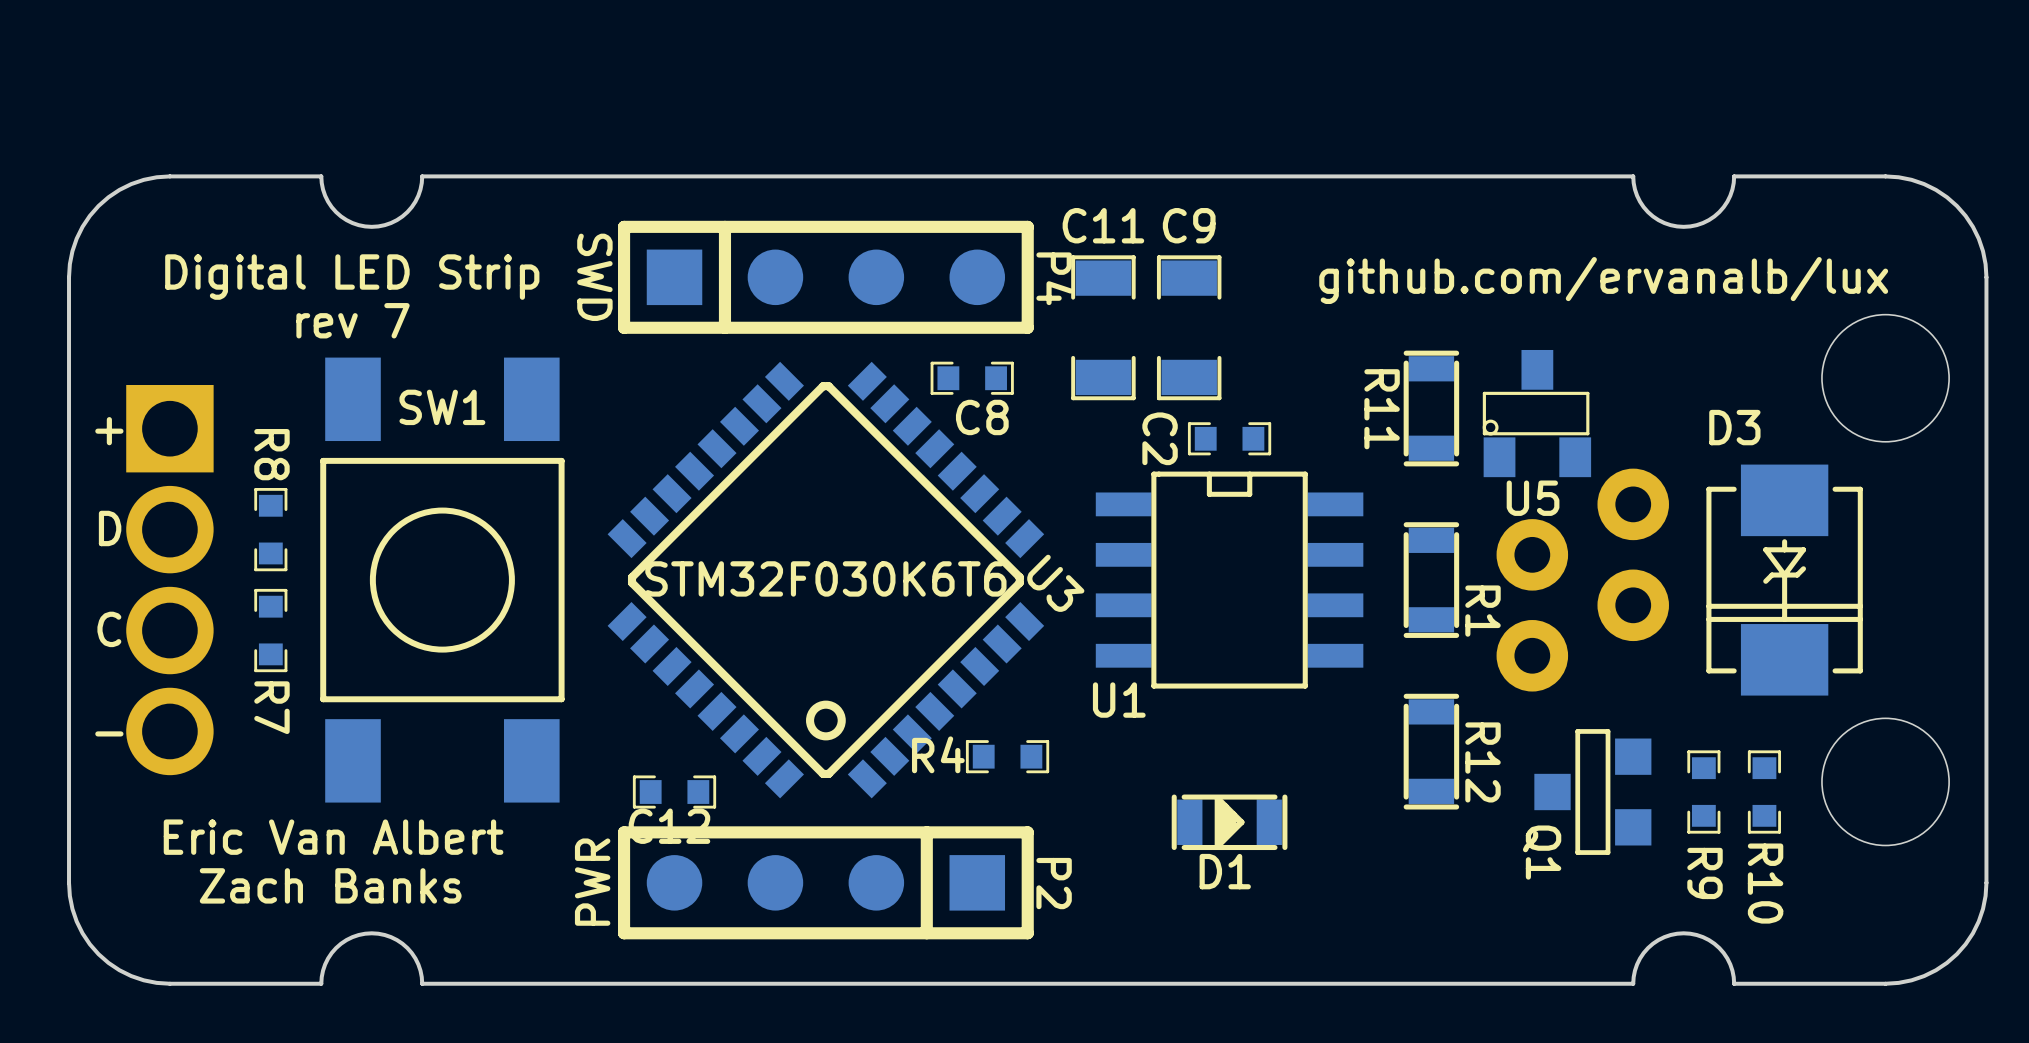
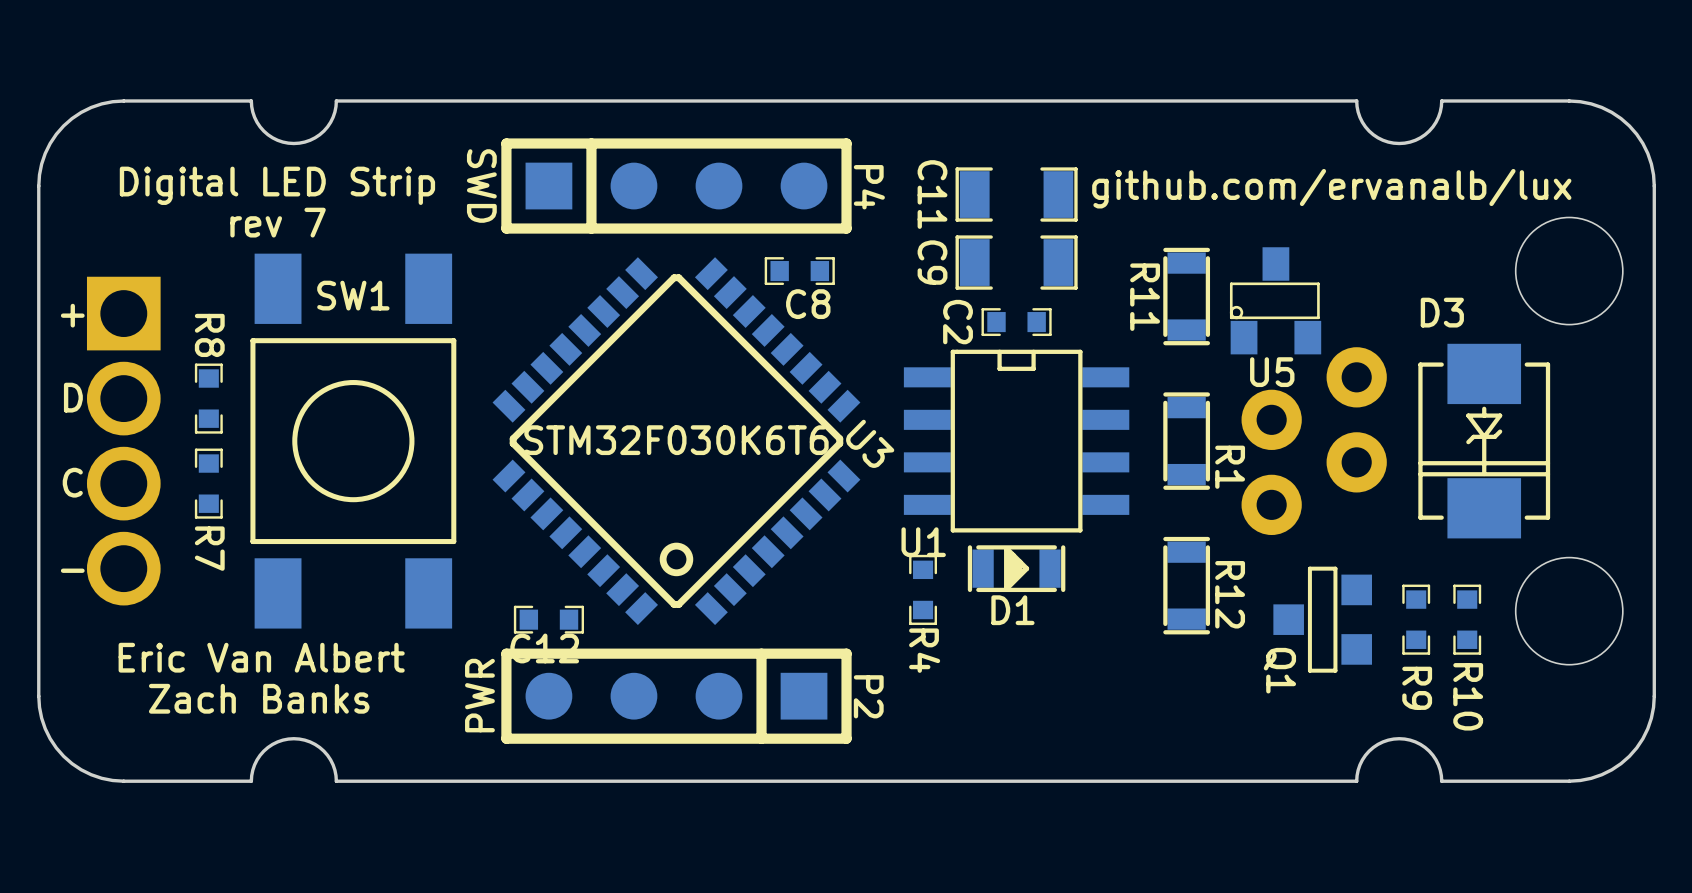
C11 name position: C11 (1103, 225) -> C11 (932, 194)
C9 name position: C9 (1189, 225) -> C9 (932, 262)
C11 rotation: 0° (1103, 327) -> 90° clockwise (1016, 194)
C11 position: (1103, 327) -> (1016, 194)
C9 rotation: 0° (1189, 327) -> 90° clockwise (1016, 262)
R4 name position: R4 (938, 754) -> R4 (924, 650)
R4 rotation: 0° (1007, 756) -> 90° clockwise (923, 589)
R4 position: (1007, 756) -> (923, 589)
D1 position: (1229, 822) -> (1016, 568)

